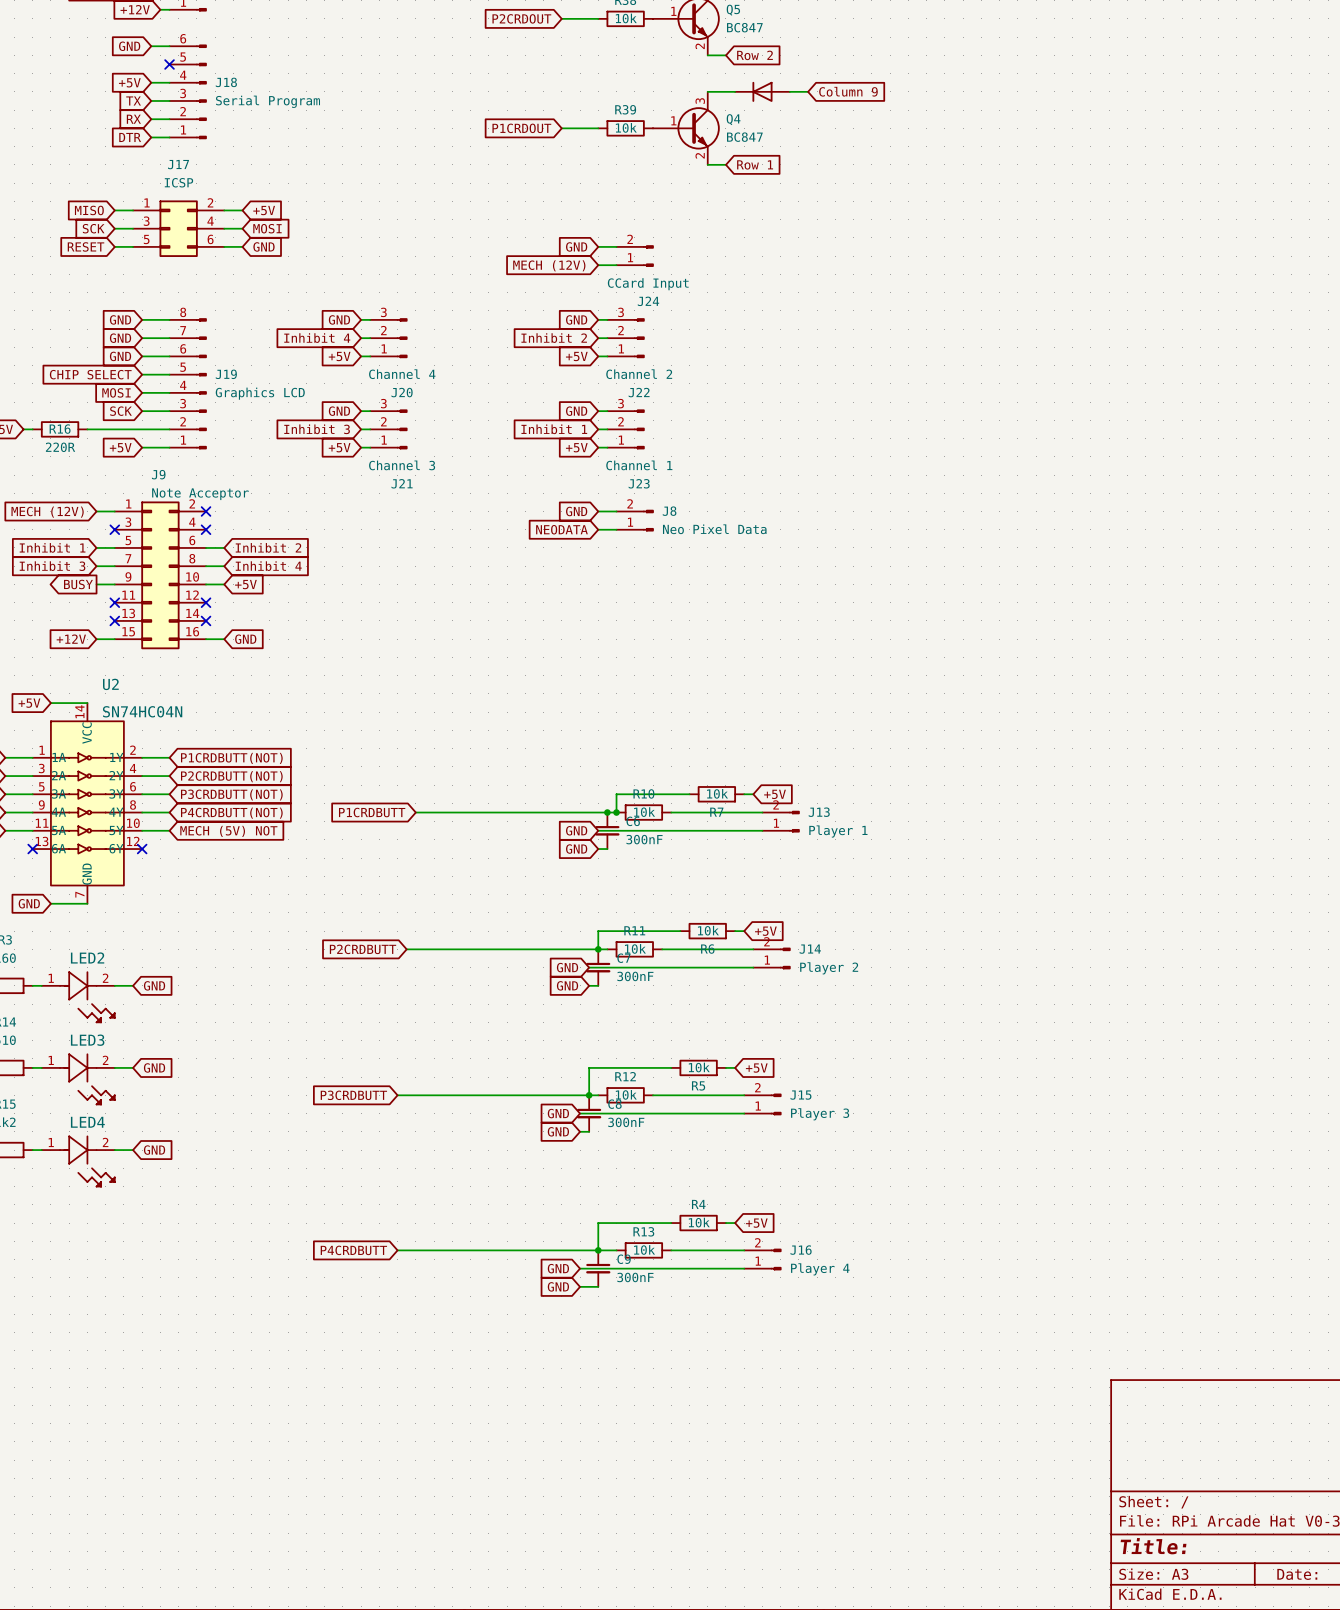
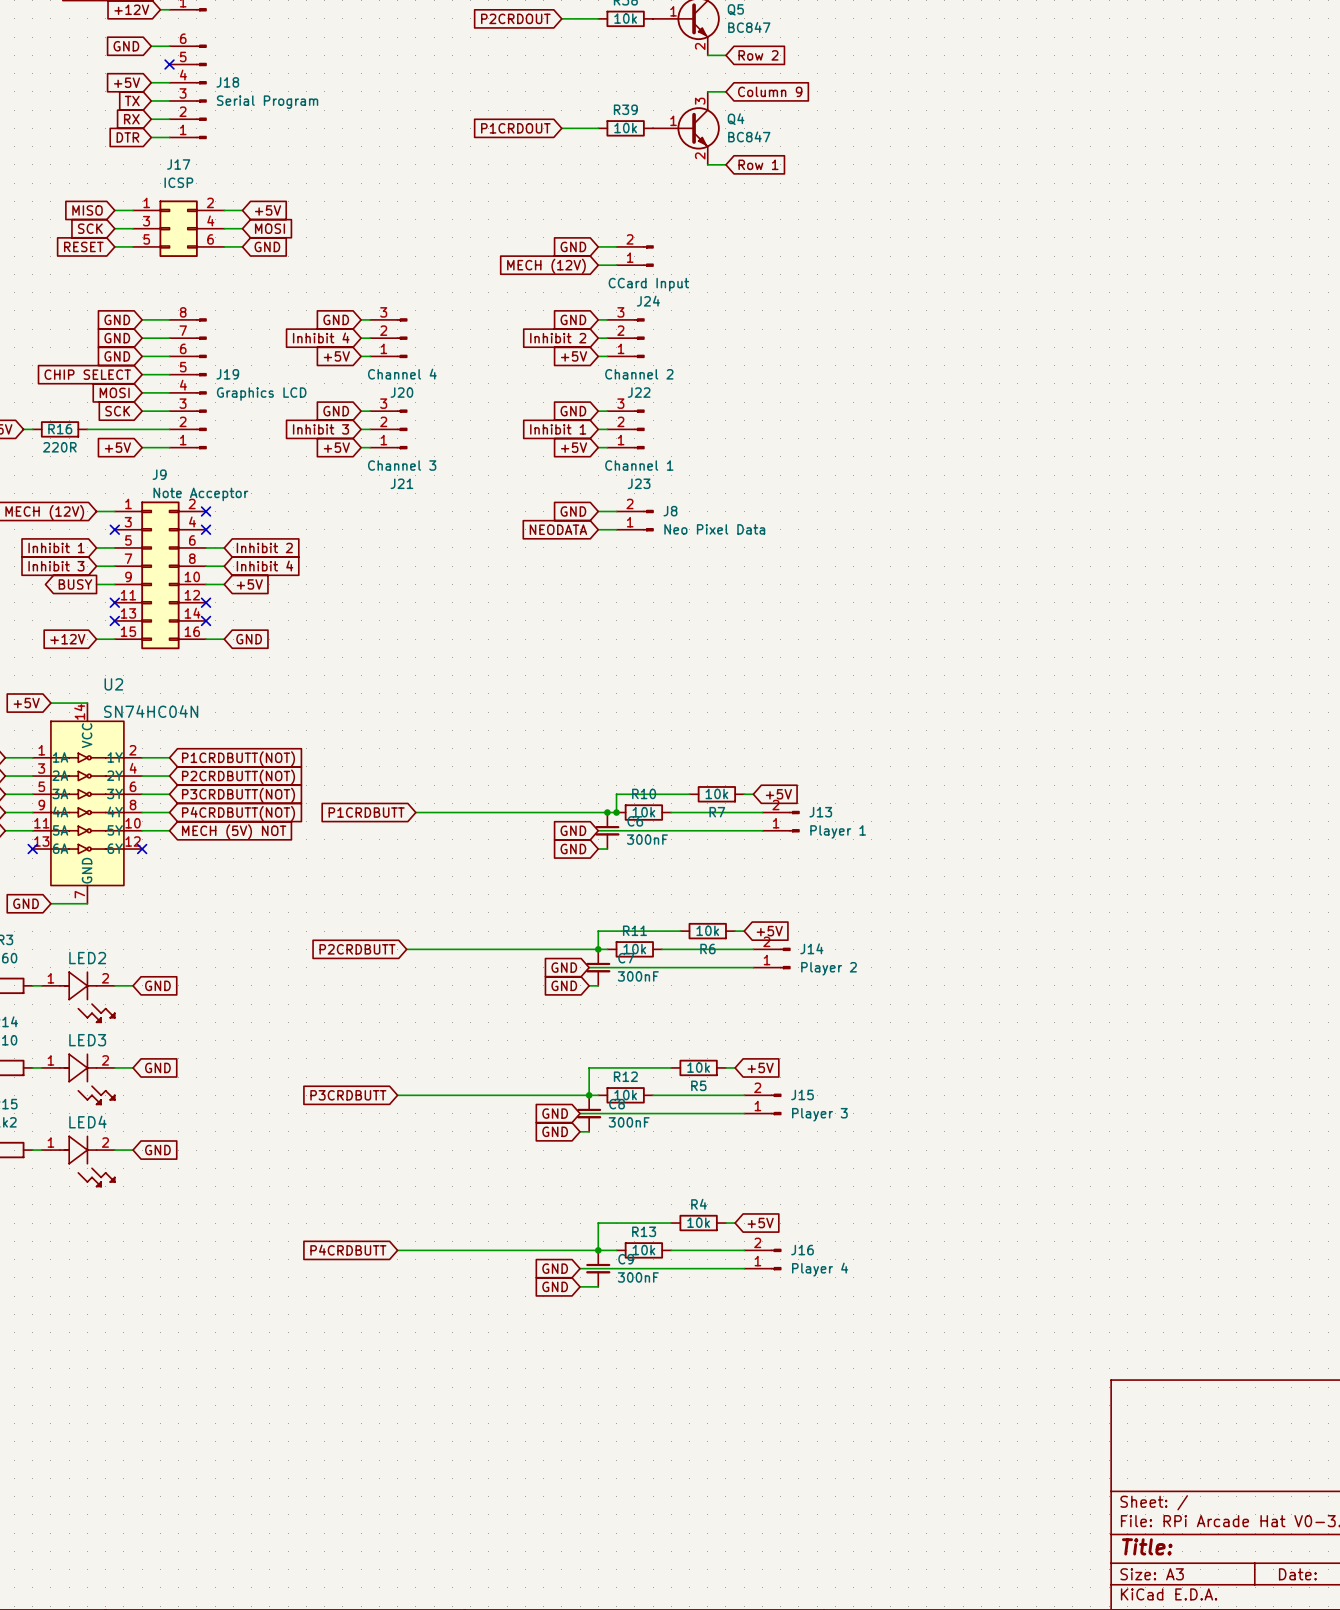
wire: (725, 91) (735, 91) -> none
part: (762, 91) -> none
wire: (789, 91) (808, 91) -> none
global label position: Column 9 (848, 91) -> Column 9 (770, 91)

